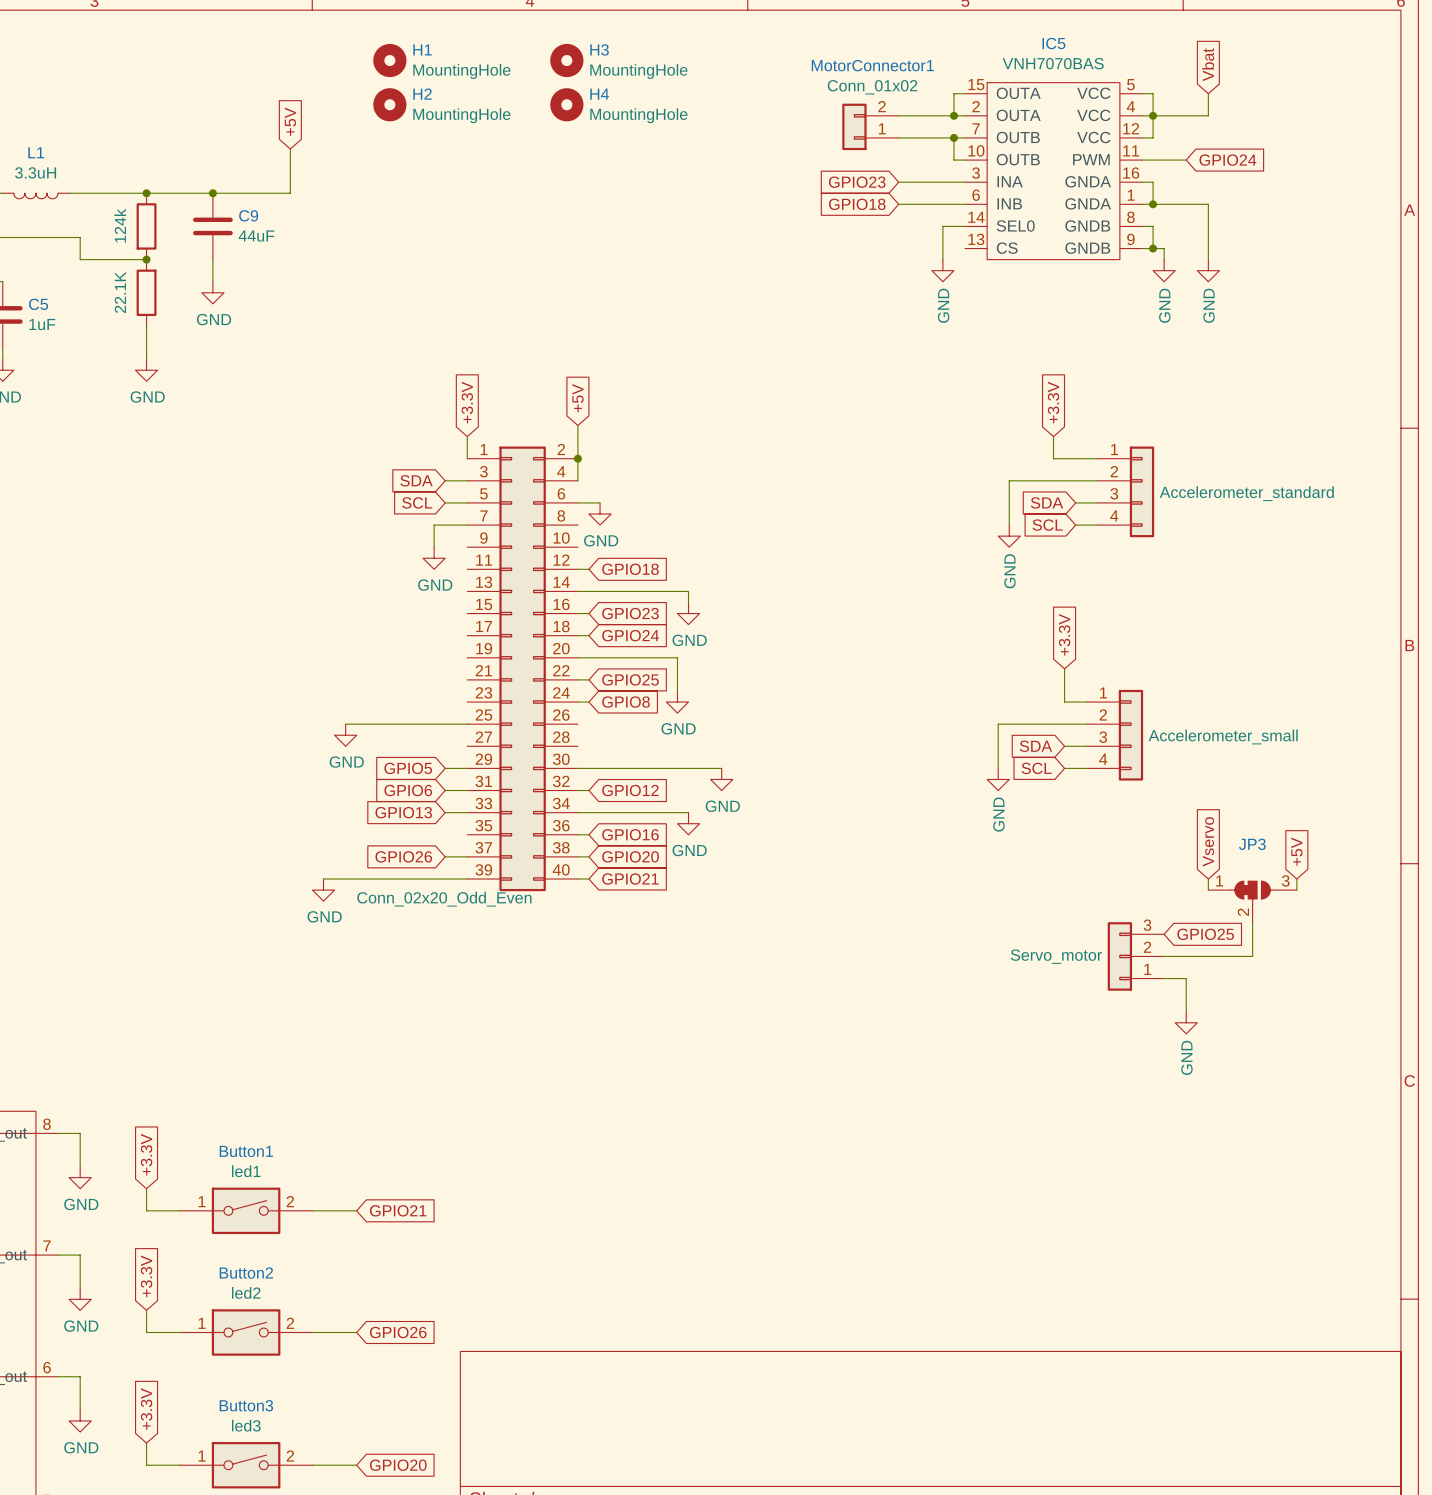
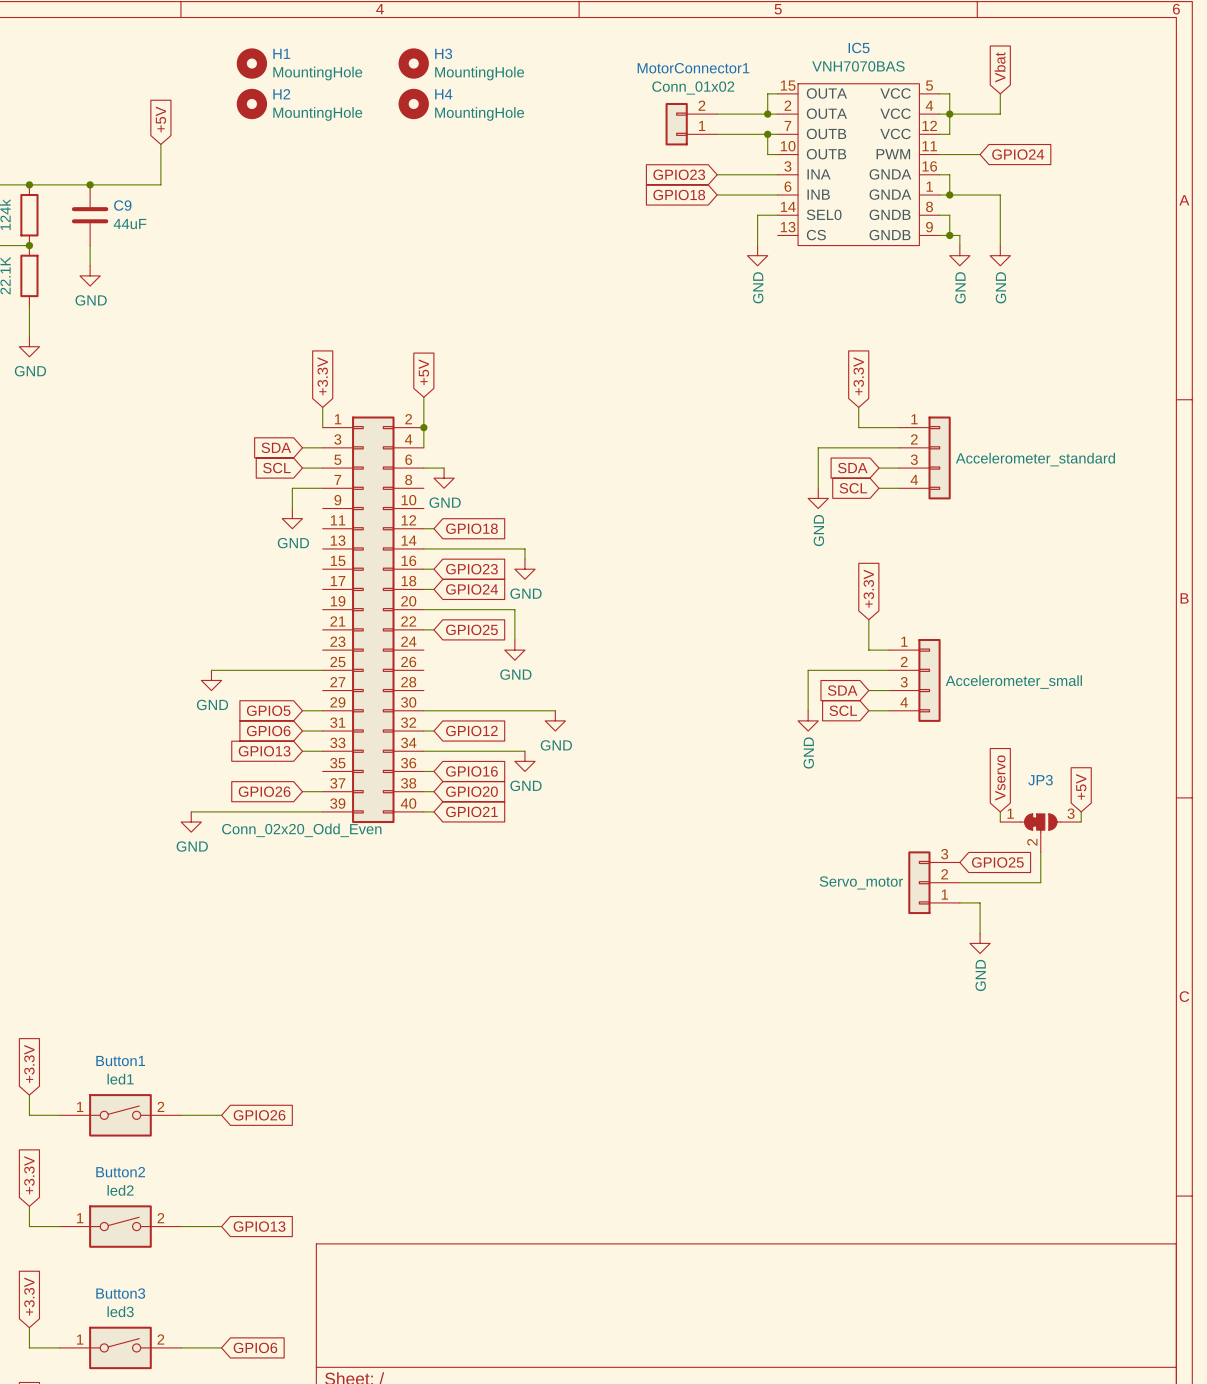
wire: (577, 702) (588, 702) -> none
global label: GPIO8 (626, 702) -> none
global label: GPIO21 (398, 1210) -> GPIO26 (259, 1115)
global label: GPIO26 (398, 1332) -> GPIO13 (259, 1226)
global label: GPIO20 (398, 1465) -> GPIO6 (255, 1347)

